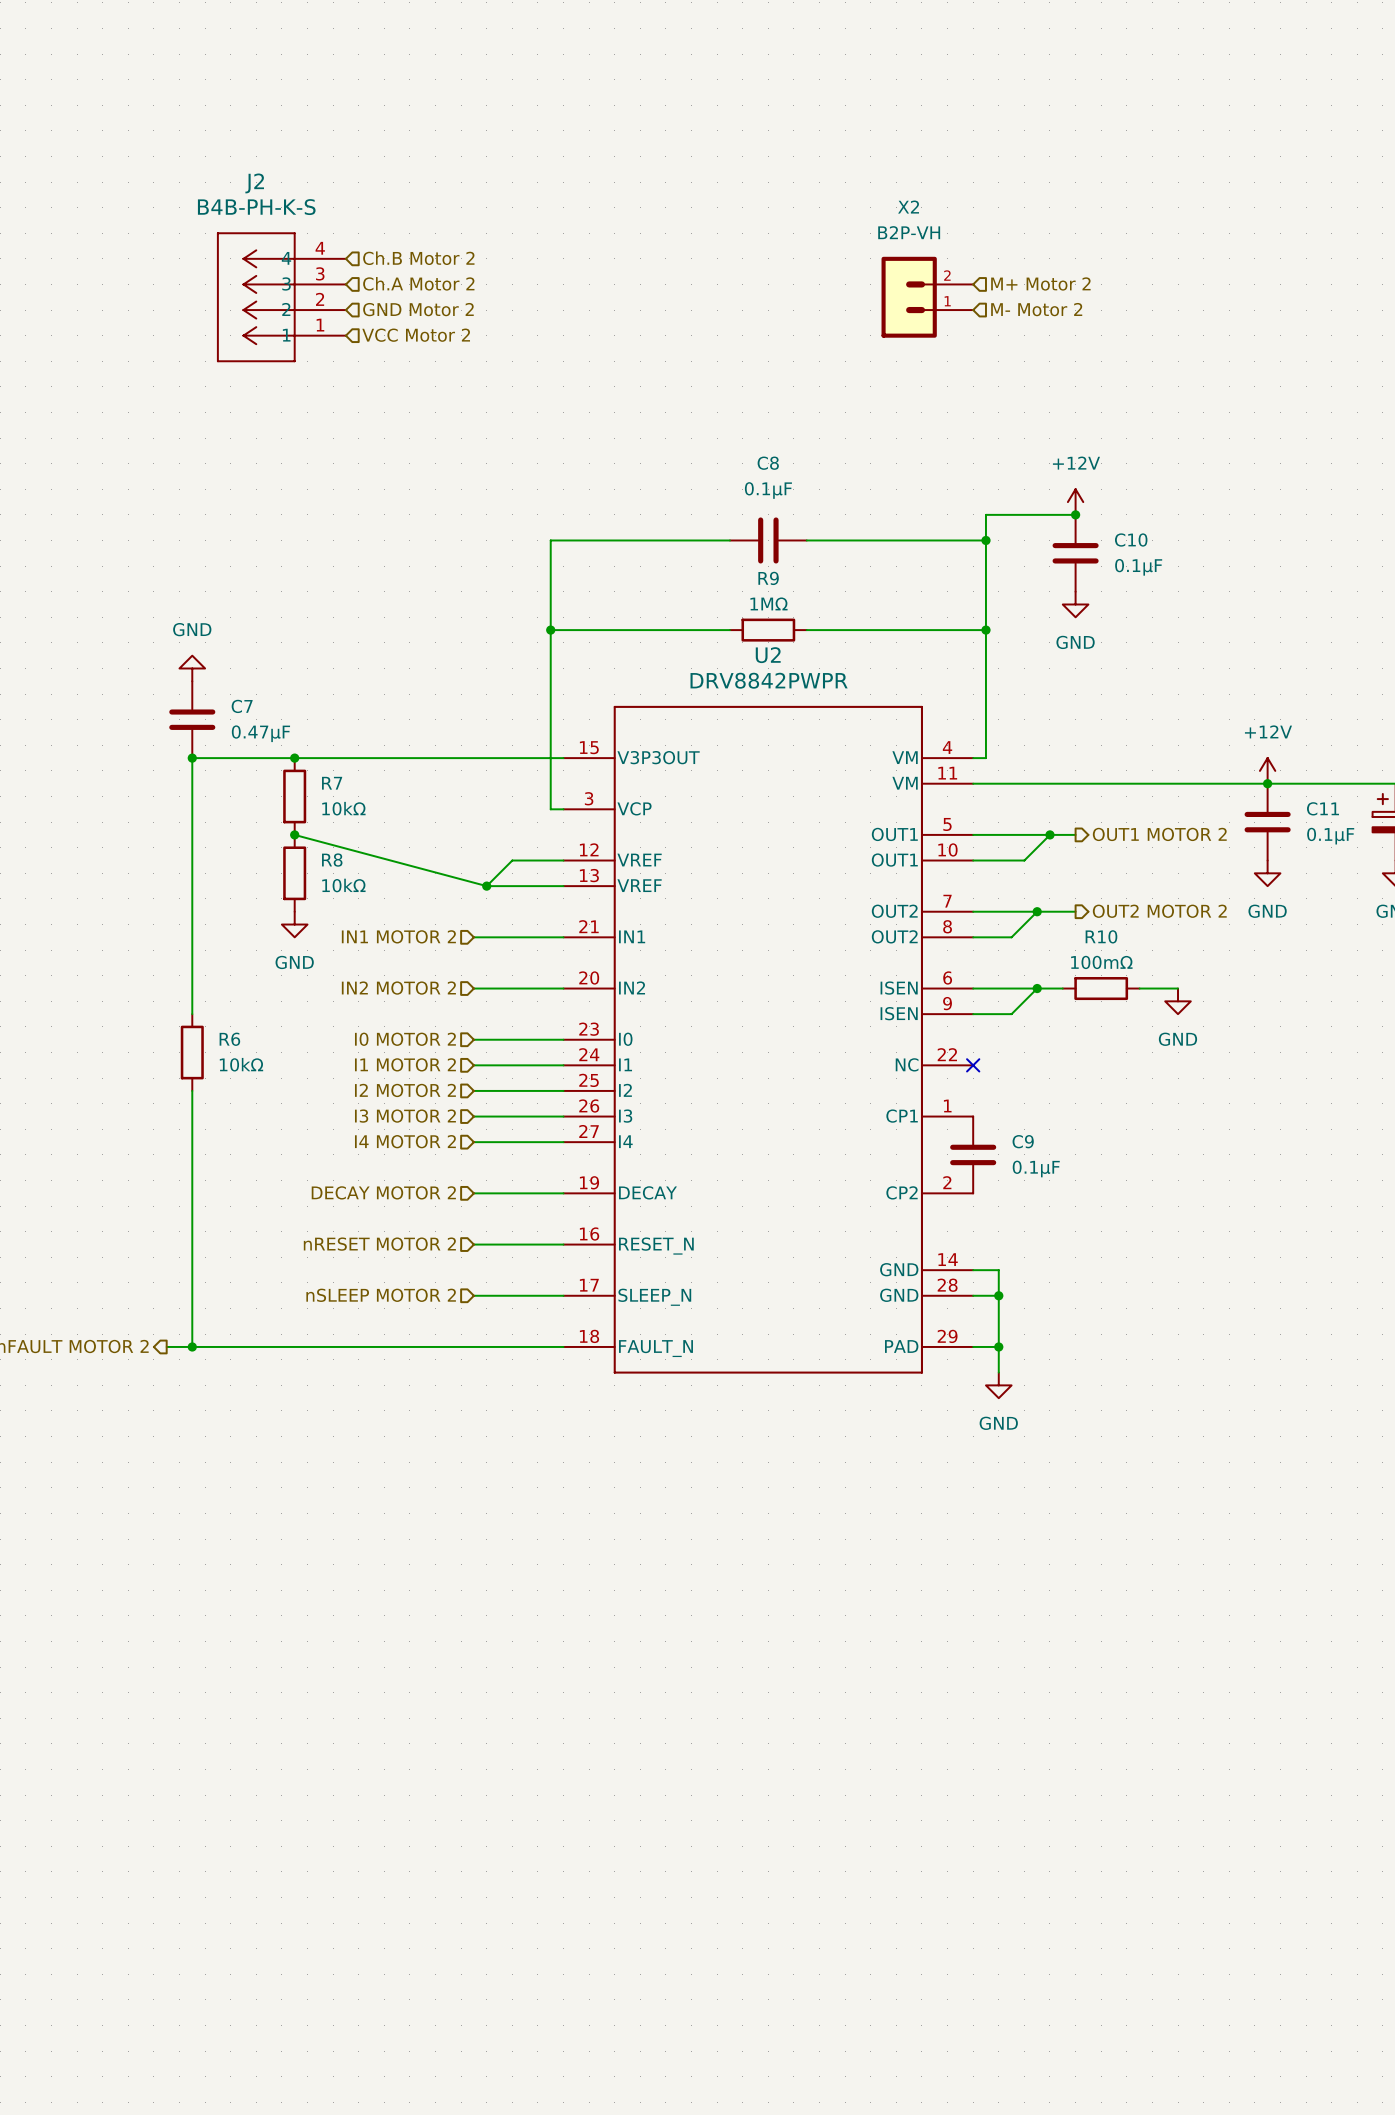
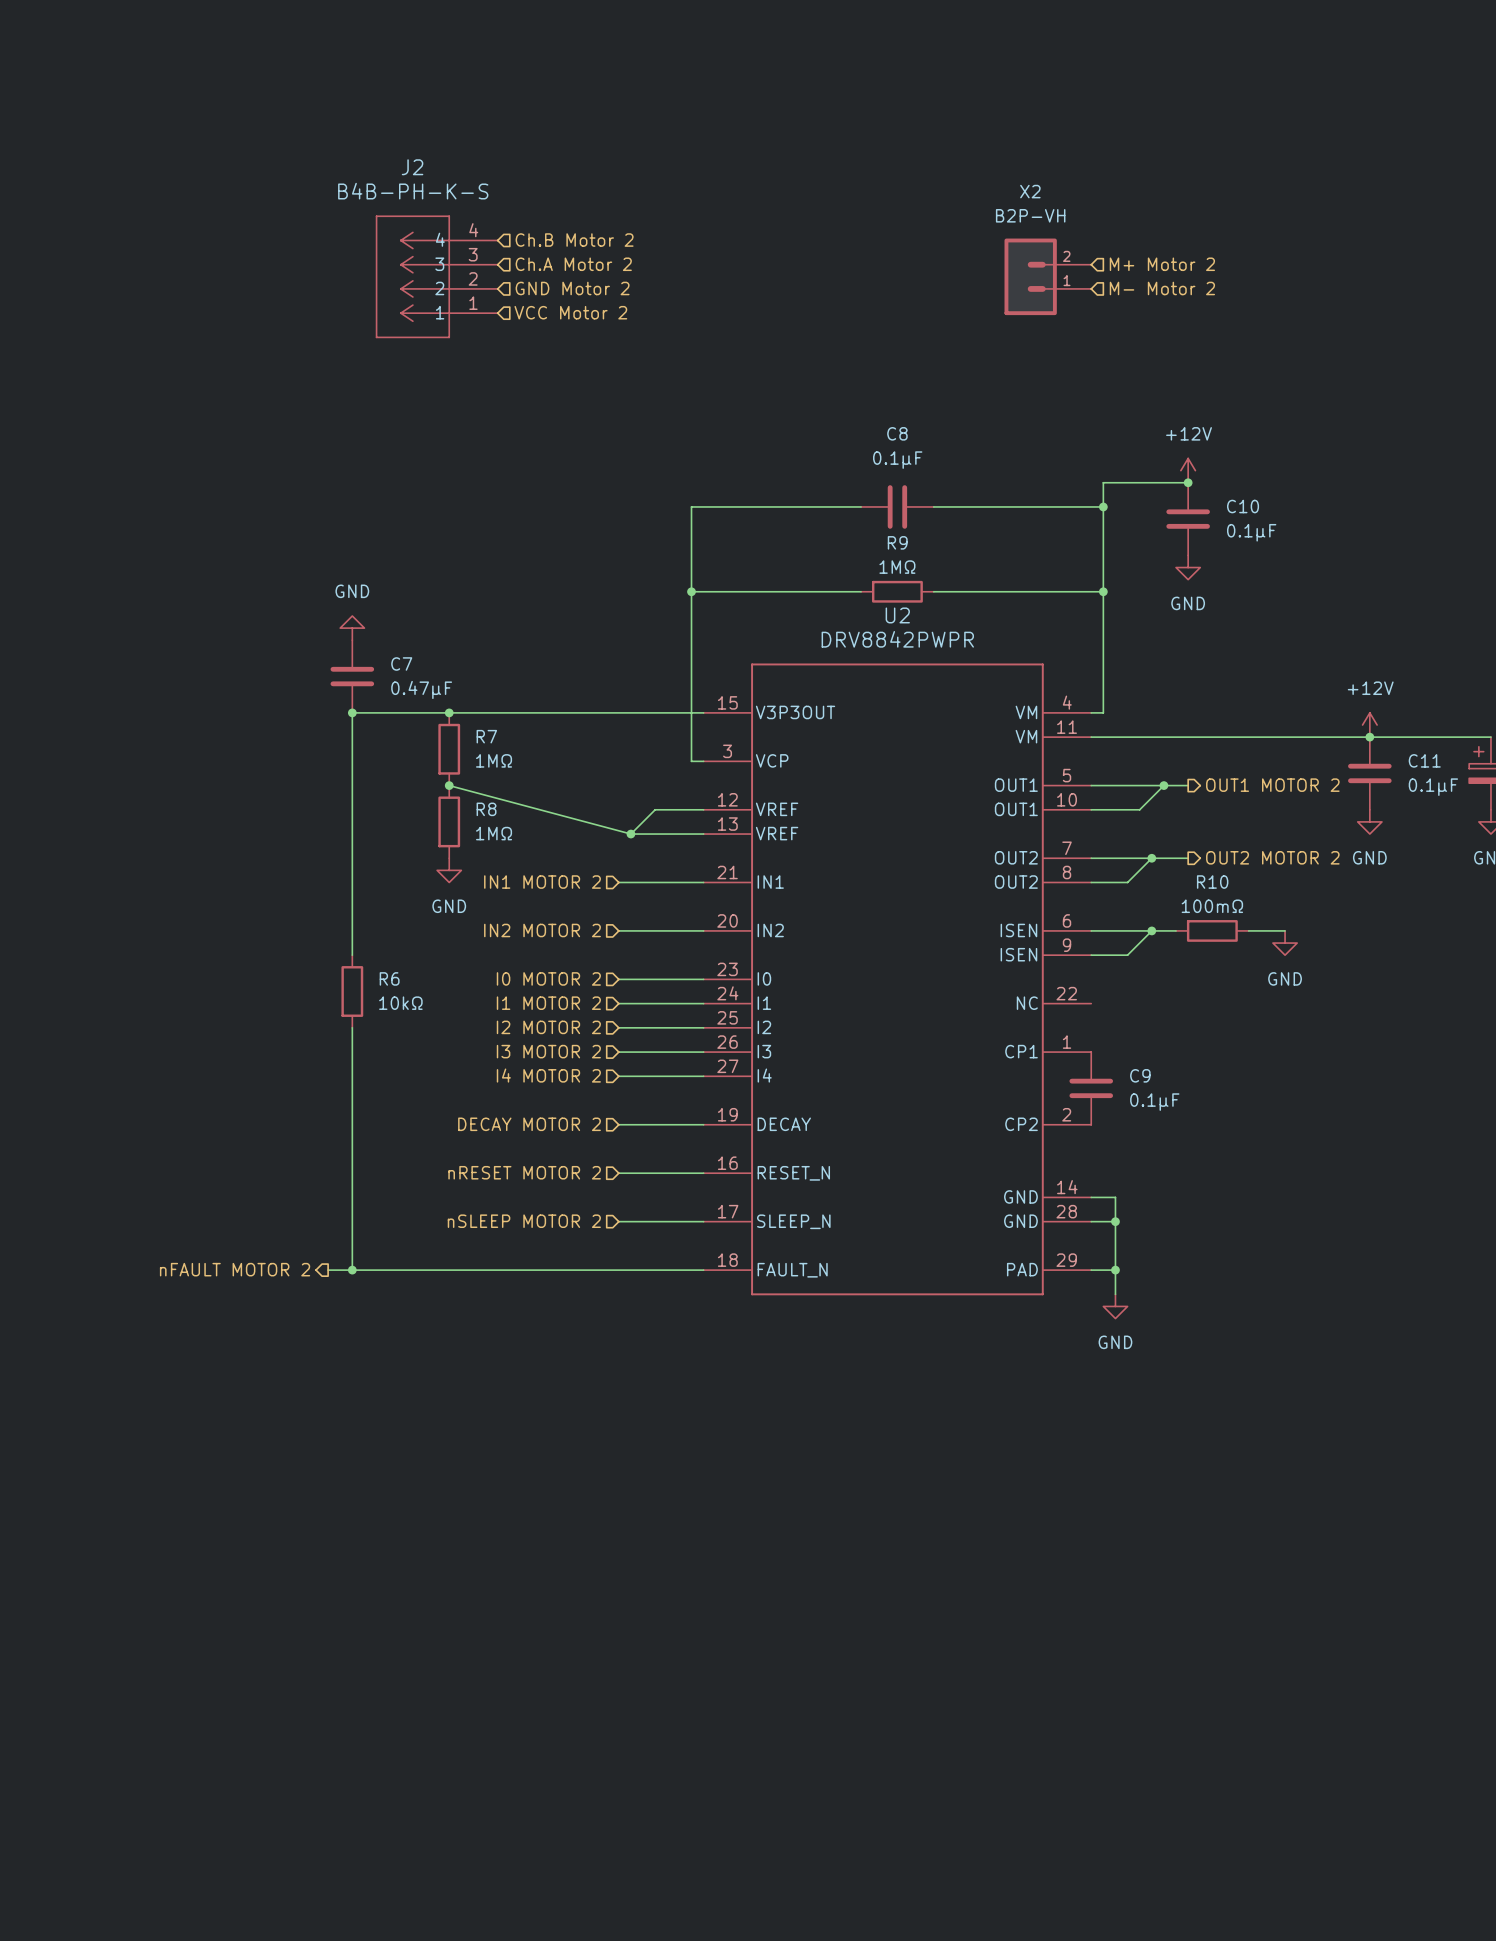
R7 value: 10kΩ (343, 808) -> 1MΩ (494, 760)
R8 value: 10kΩ (343, 885) -> 1MΩ (494, 833)
no-connect mark: (973, 1065) -> none

